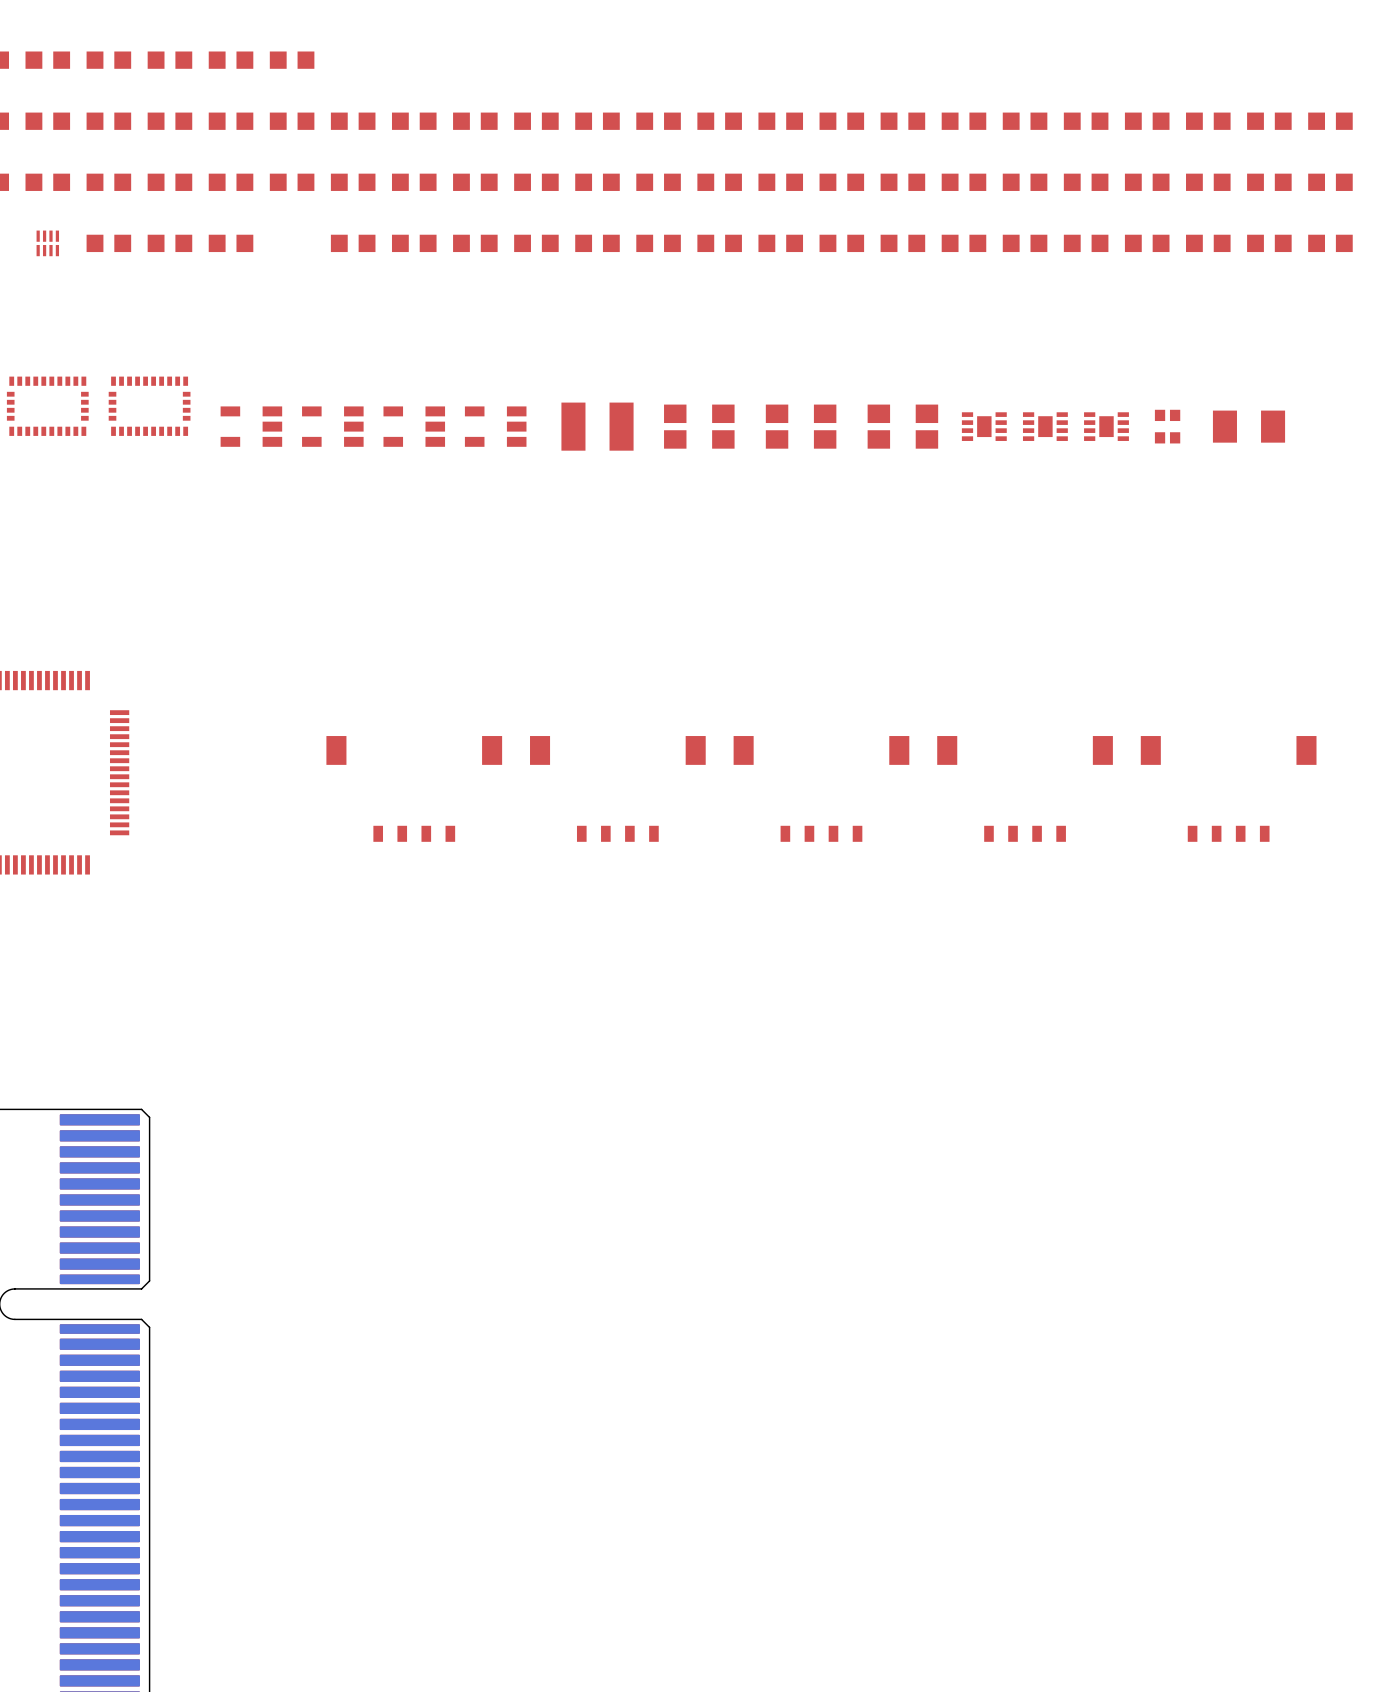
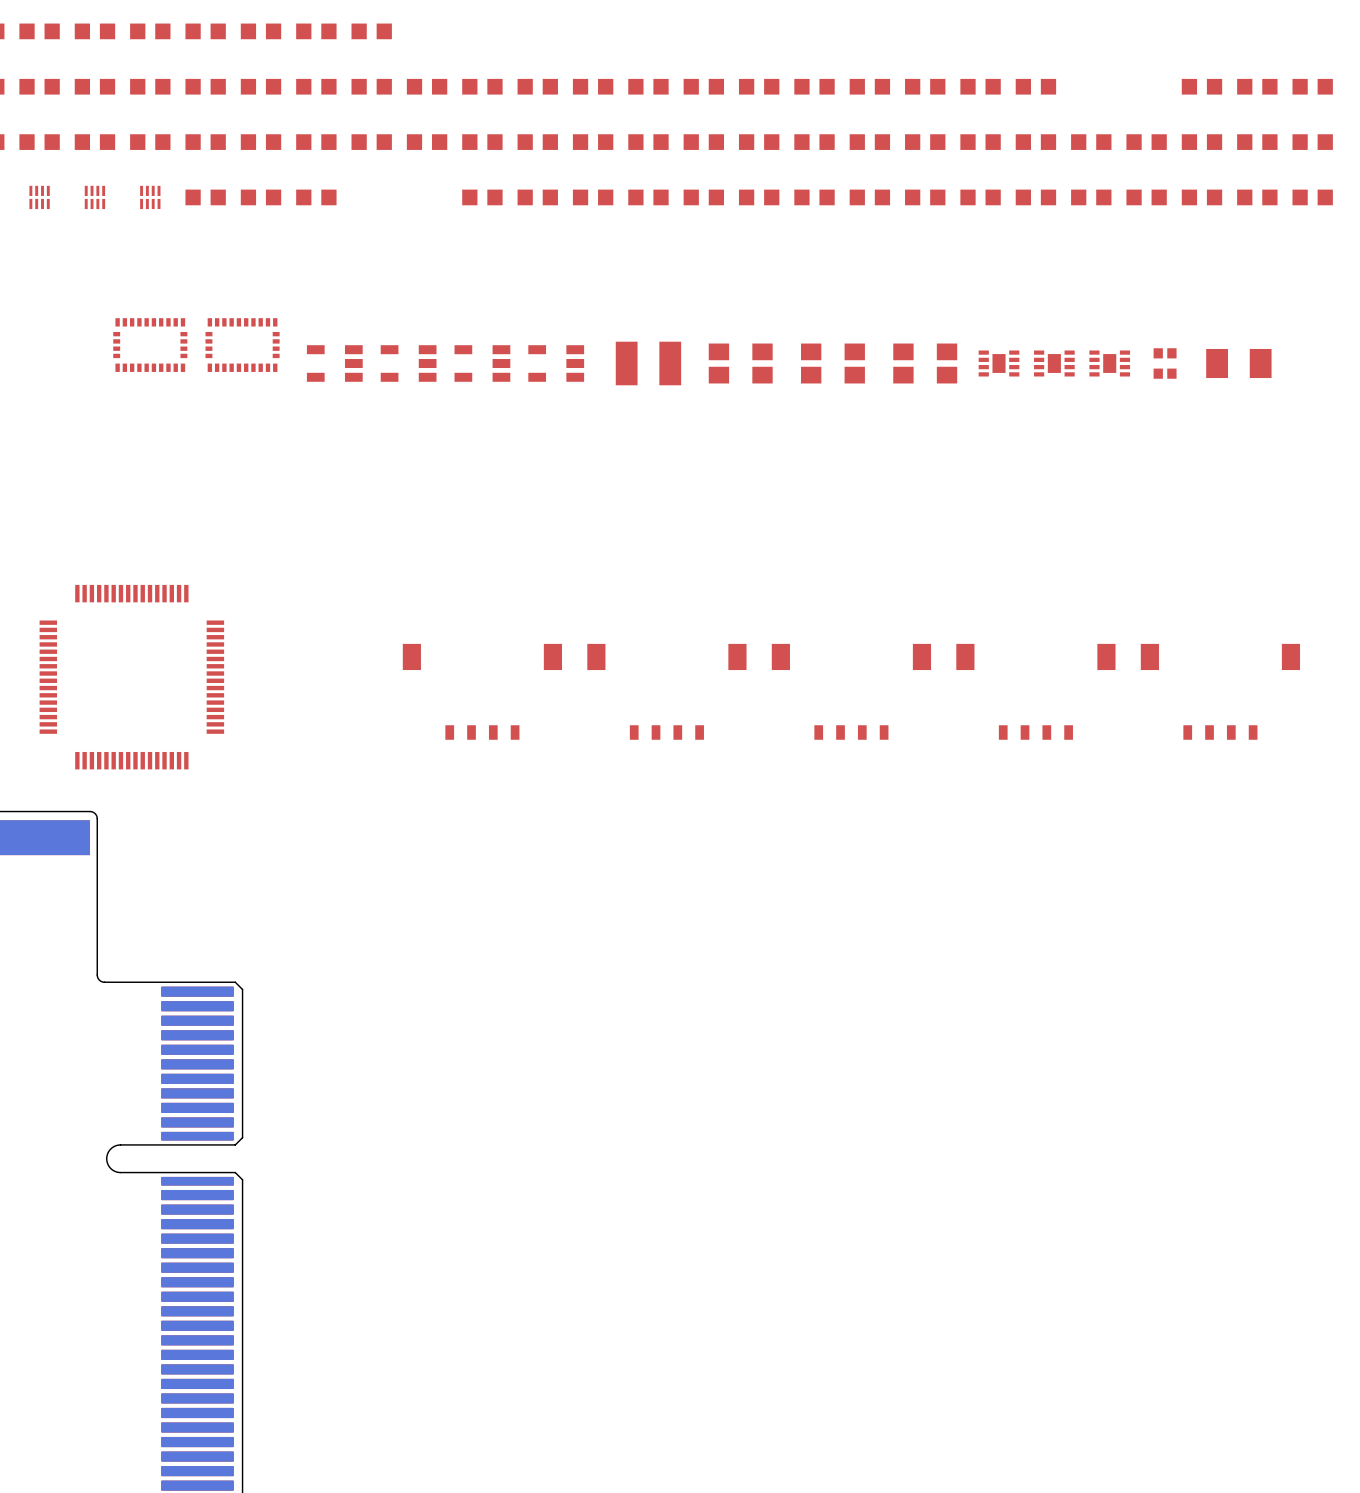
part: (1086, 121) -> none
part: (1147, 121) -> none
part: (353, 243) -> none

